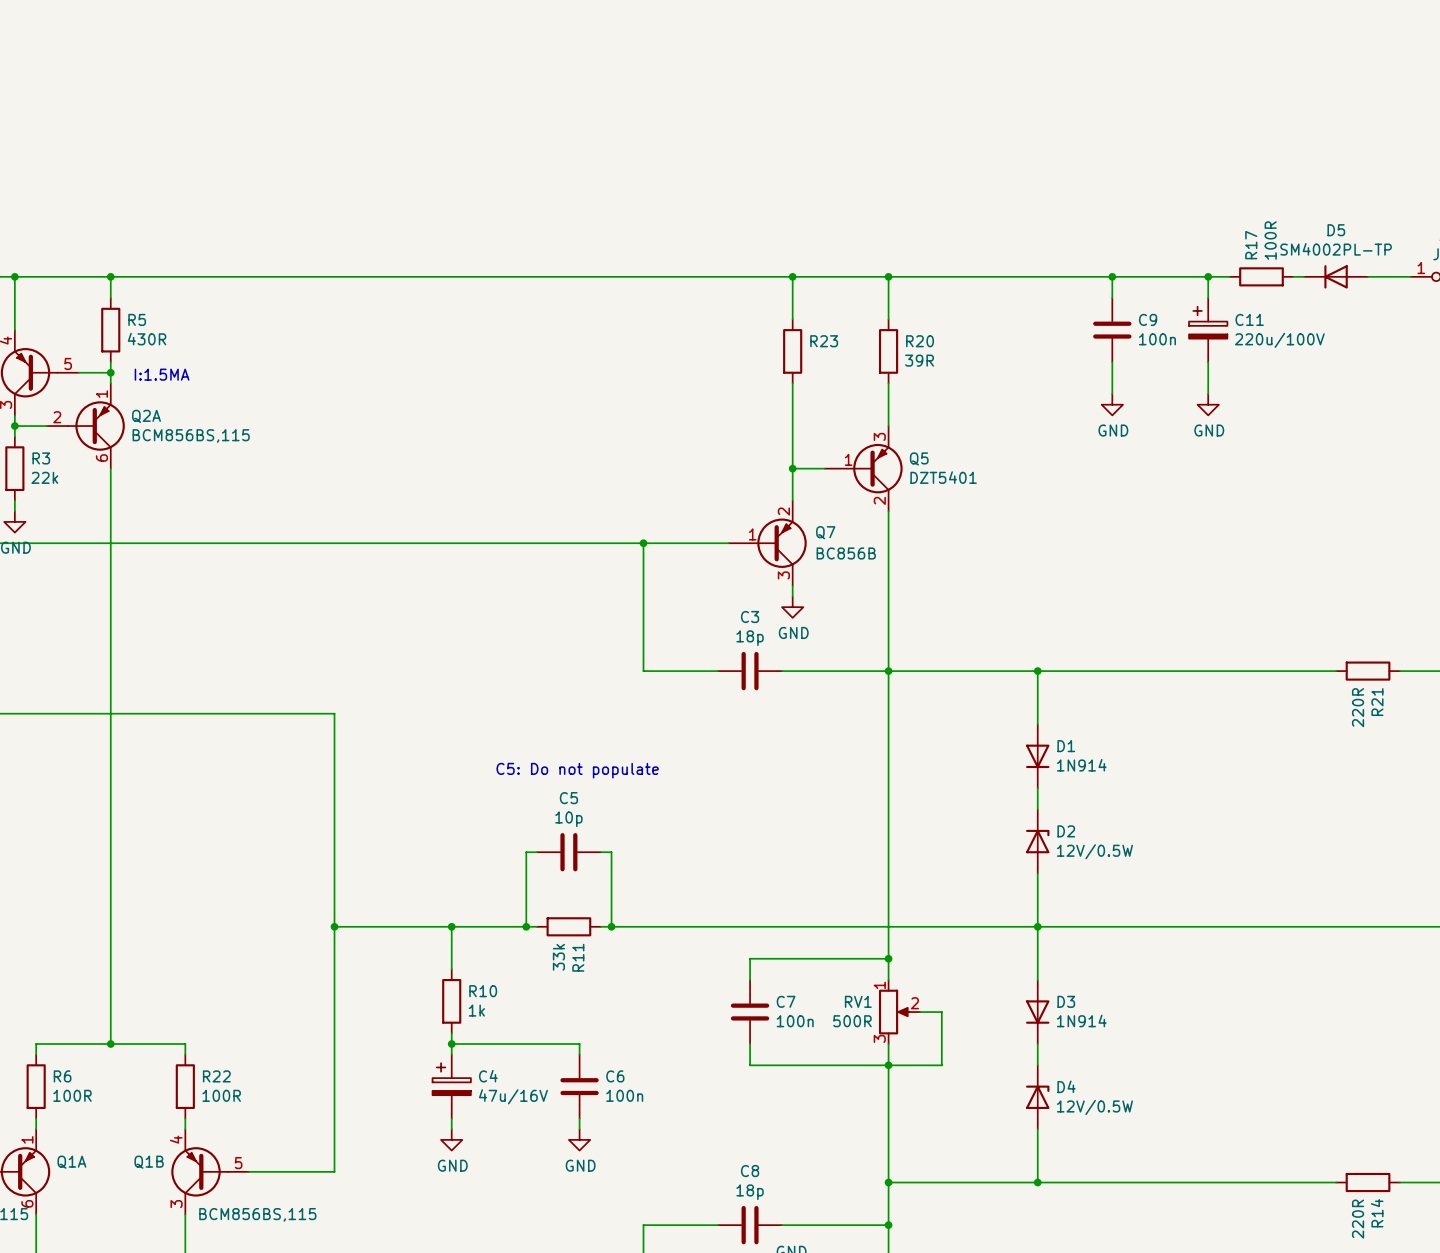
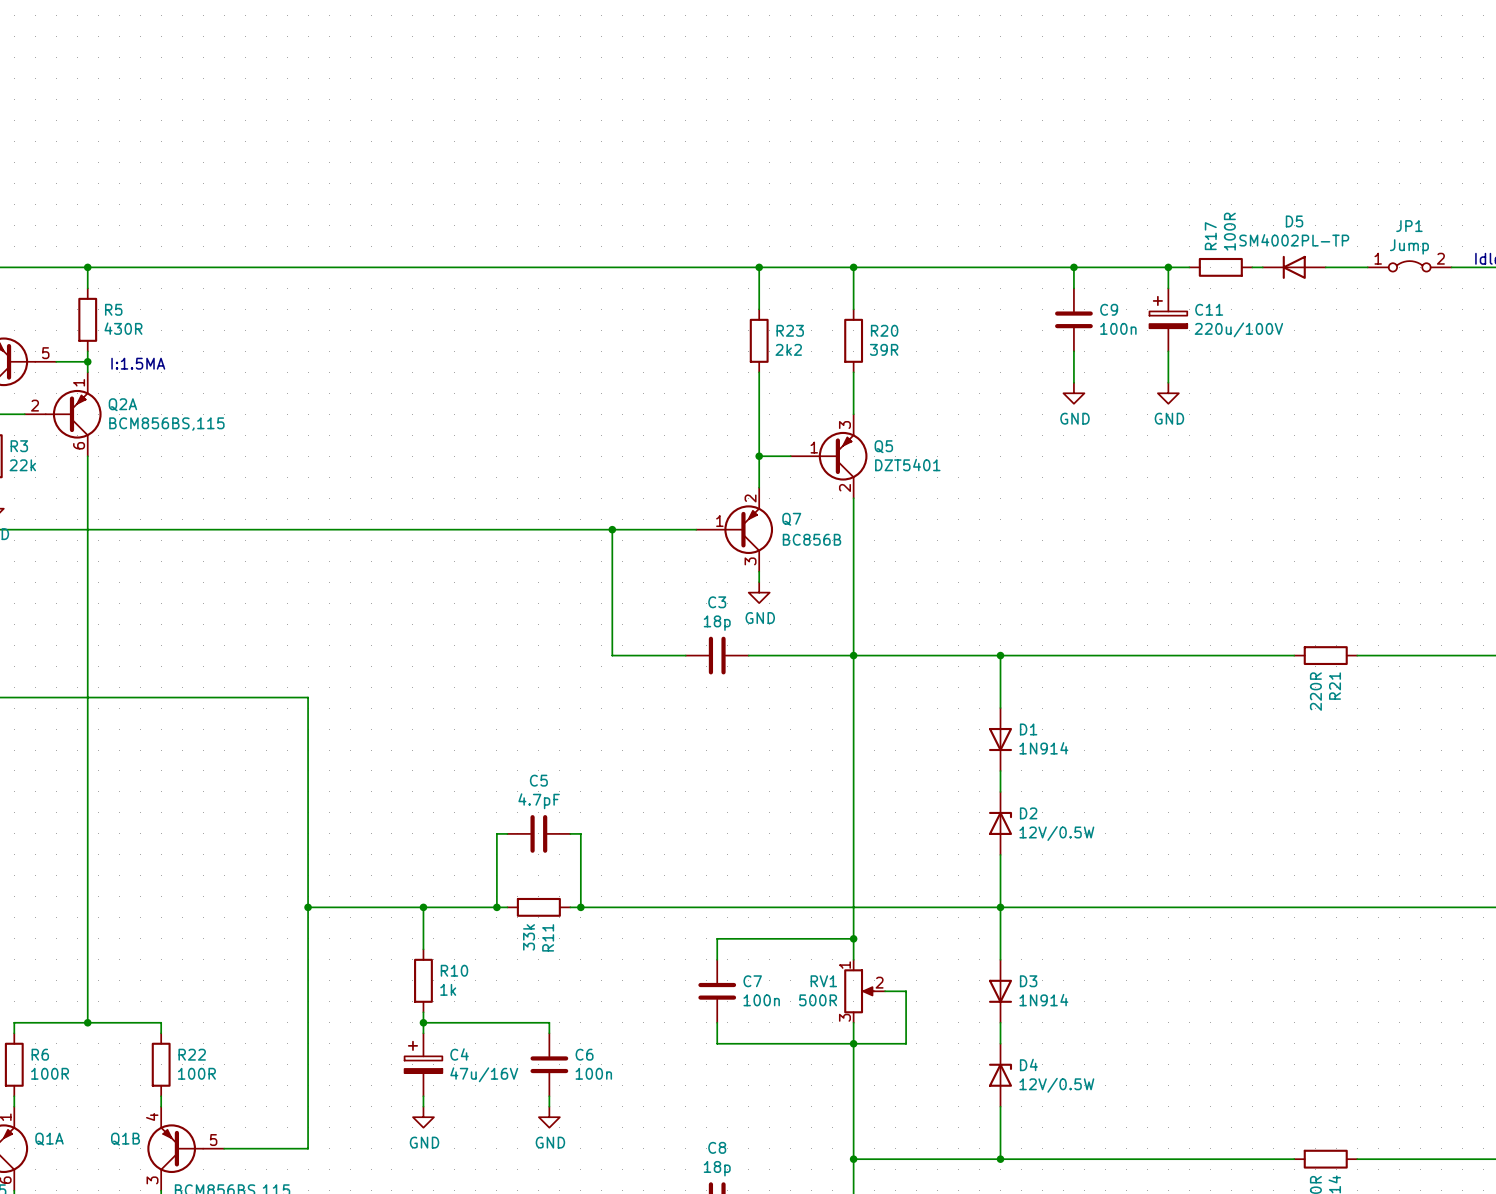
R23 value: none -> 2k2 (788, 349)
text: C5: Do not populate (577, 770) -> none
C5 value: 10p (568, 819) -> 4.7pF (539, 801)

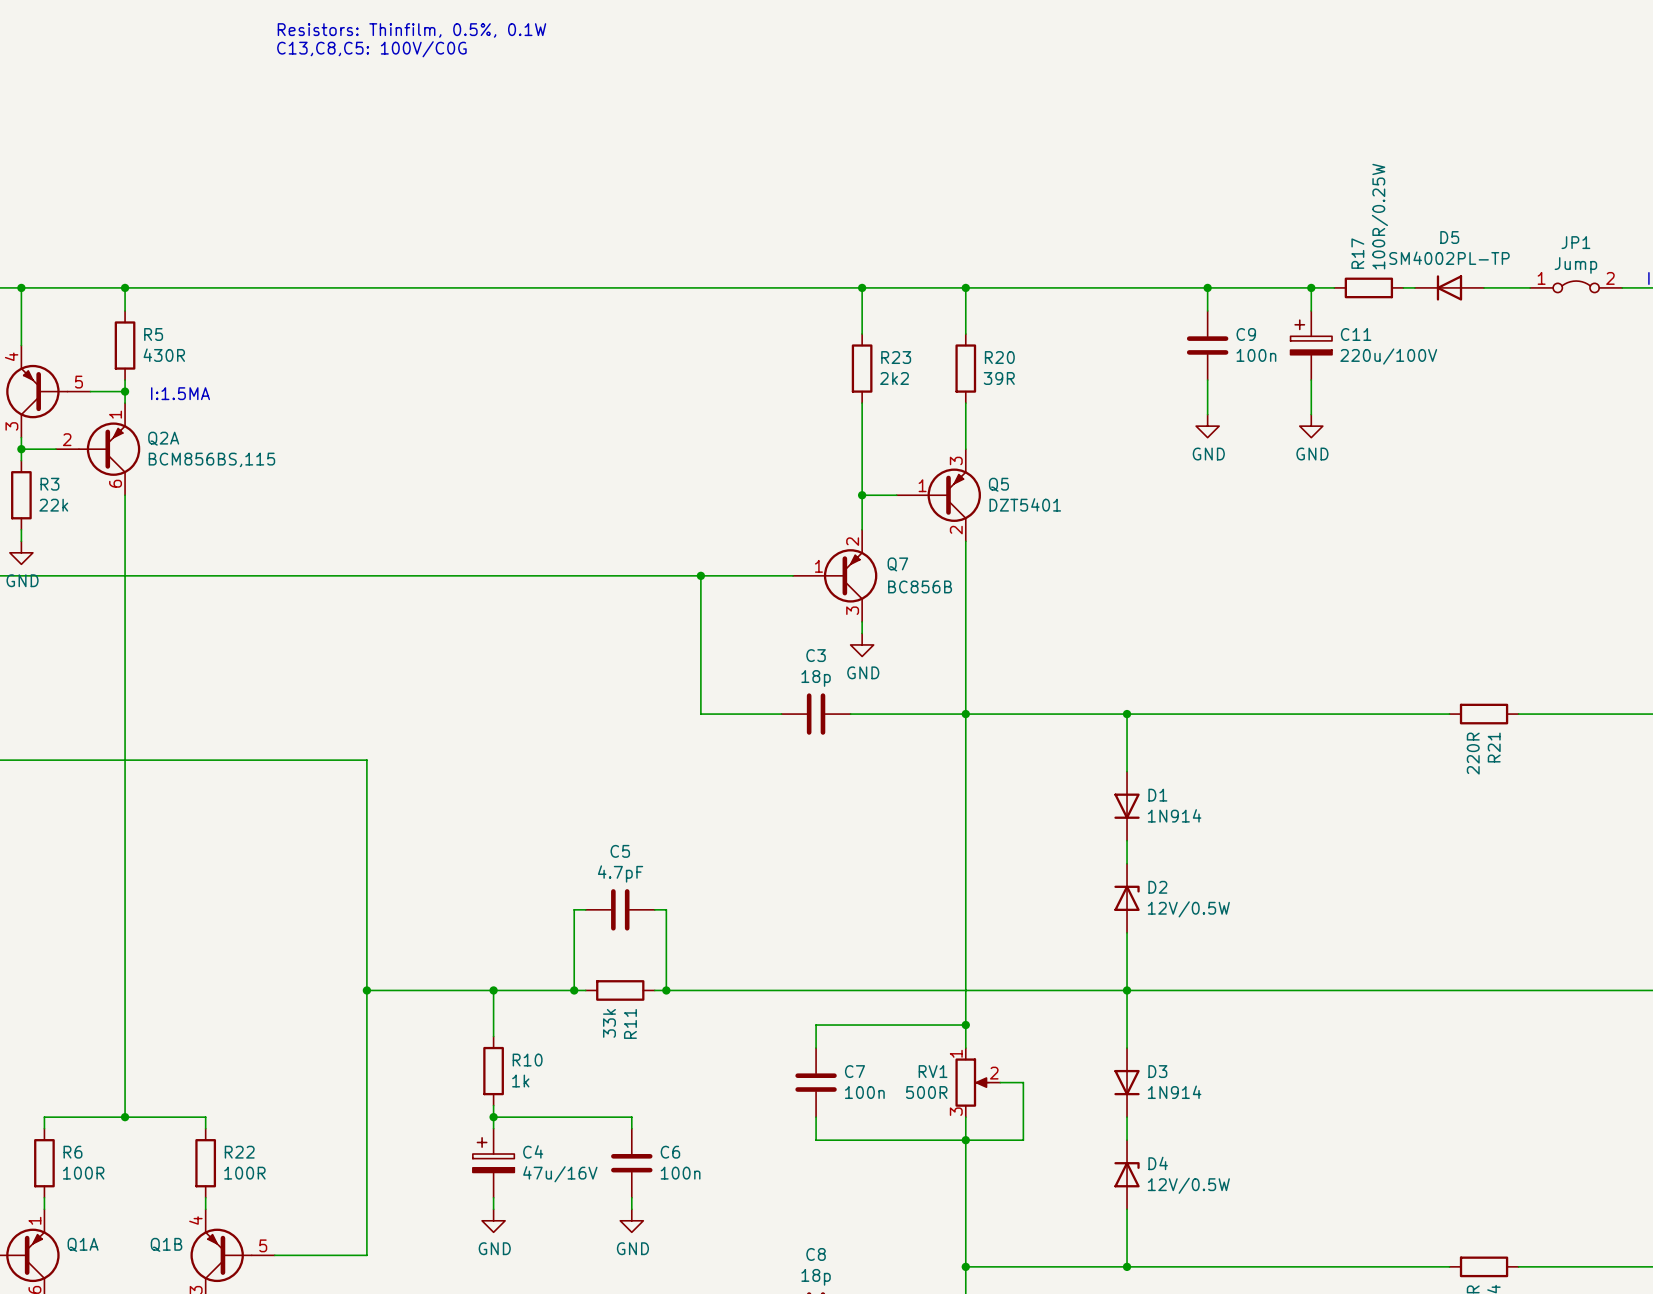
text: none -> Resistors: Thinfilm, 0.5%, 0.1W (411, 30)
text: none -> C13,C8,C5: 100V/C0G (371, 49)
R17 value: 100R (1229, 231) -> 100R/0.25W (1379, 216)

